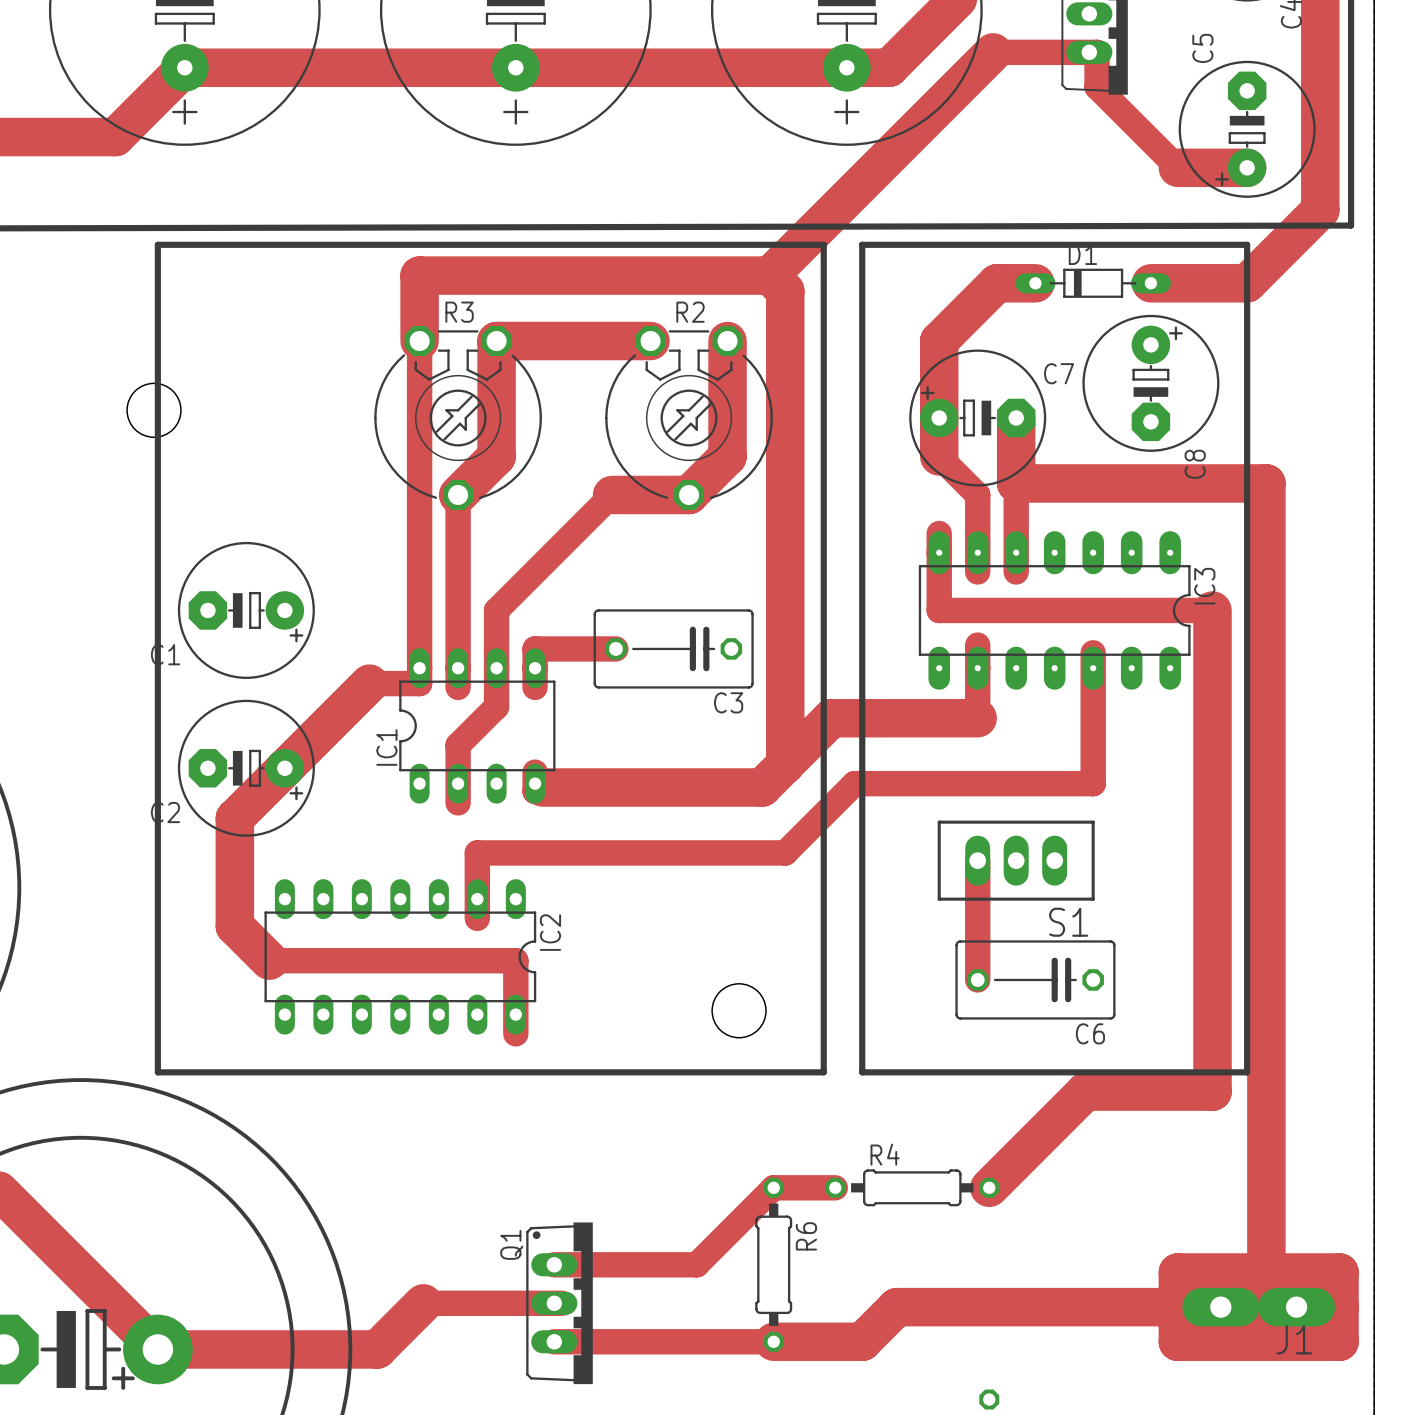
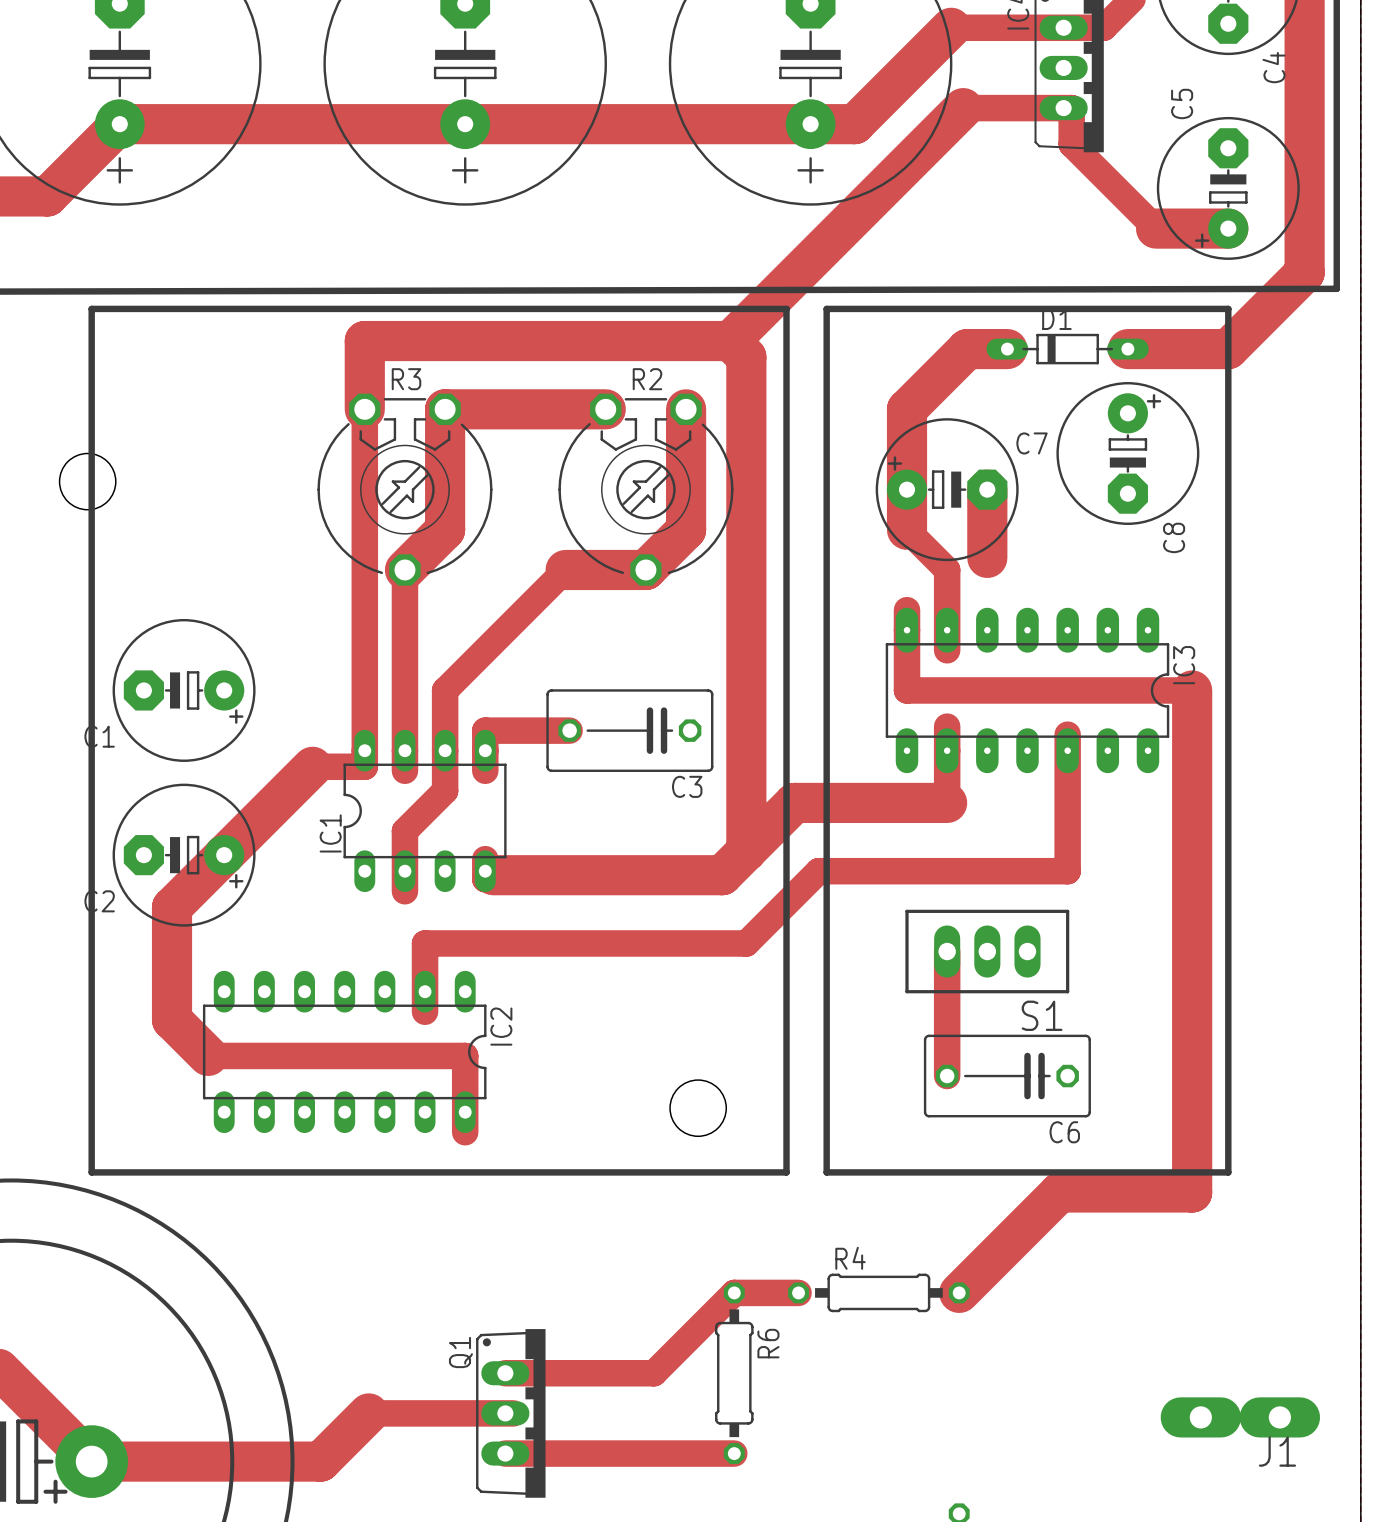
track: (1016, 571) (1016, 483) (1266, 483) (1266, 1307) (1208, 1310) -> none
track: (1177, 1272) (1339, 1272) (1339, 1341) (1177, 1341) (1177, 1272) -> none
track: (1208, 1310) (1177, 1307) (896, 1307) (862, 1341) (773, 1341) -> none

